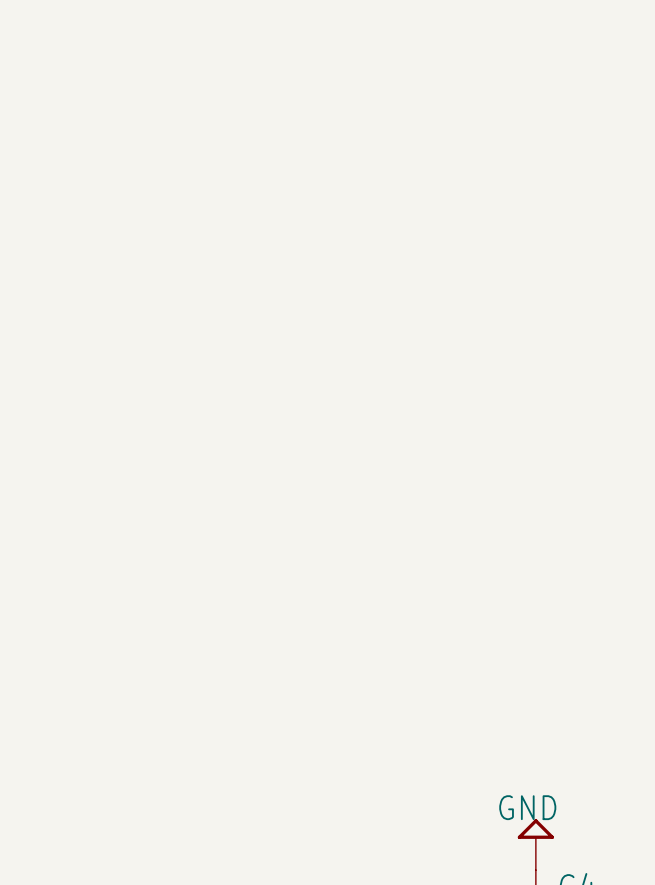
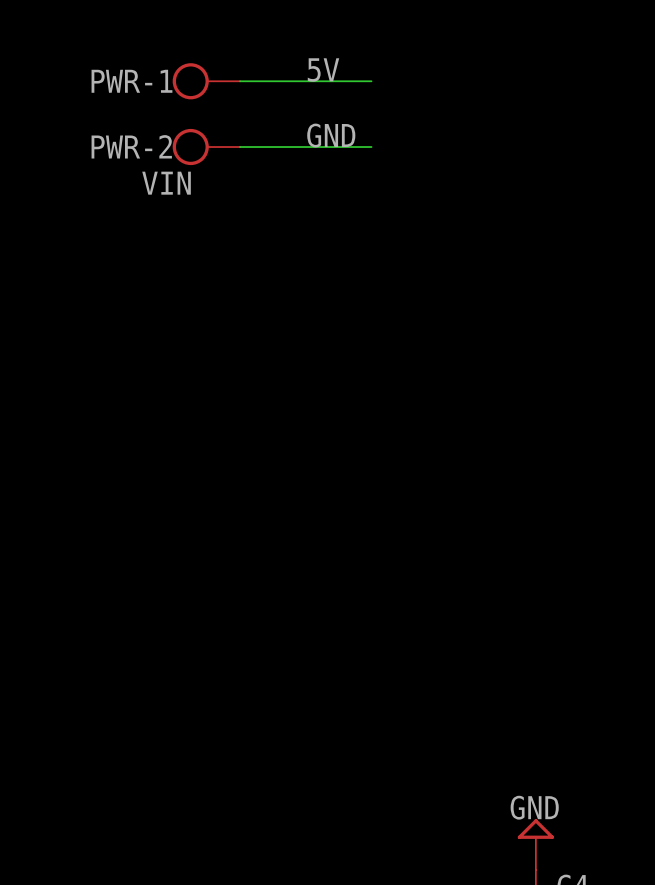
label: none -> 5V (323, 69)
PWR-1: none -> (206, 81)
wire: none -> (240, 81) (371, 81)
label: none -> GND (331, 135)
PWR-2: none -> VIN (206, 147)
wire: none -> (240, 147) (371, 147)

